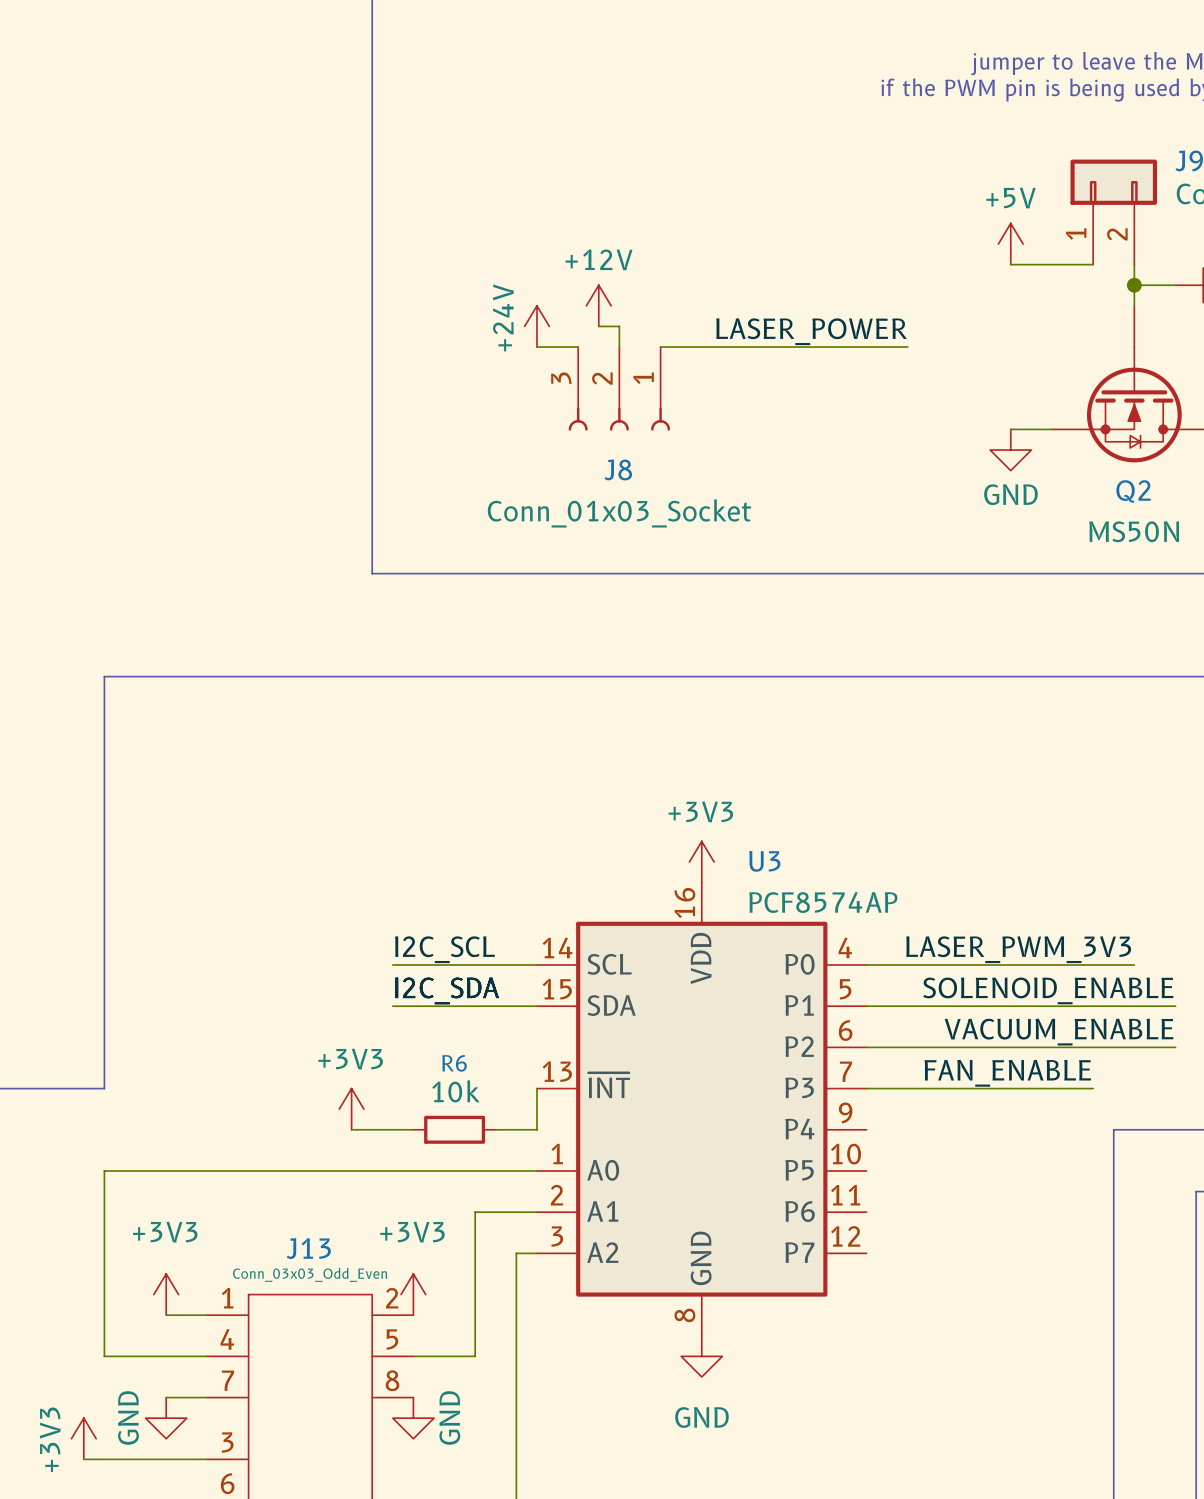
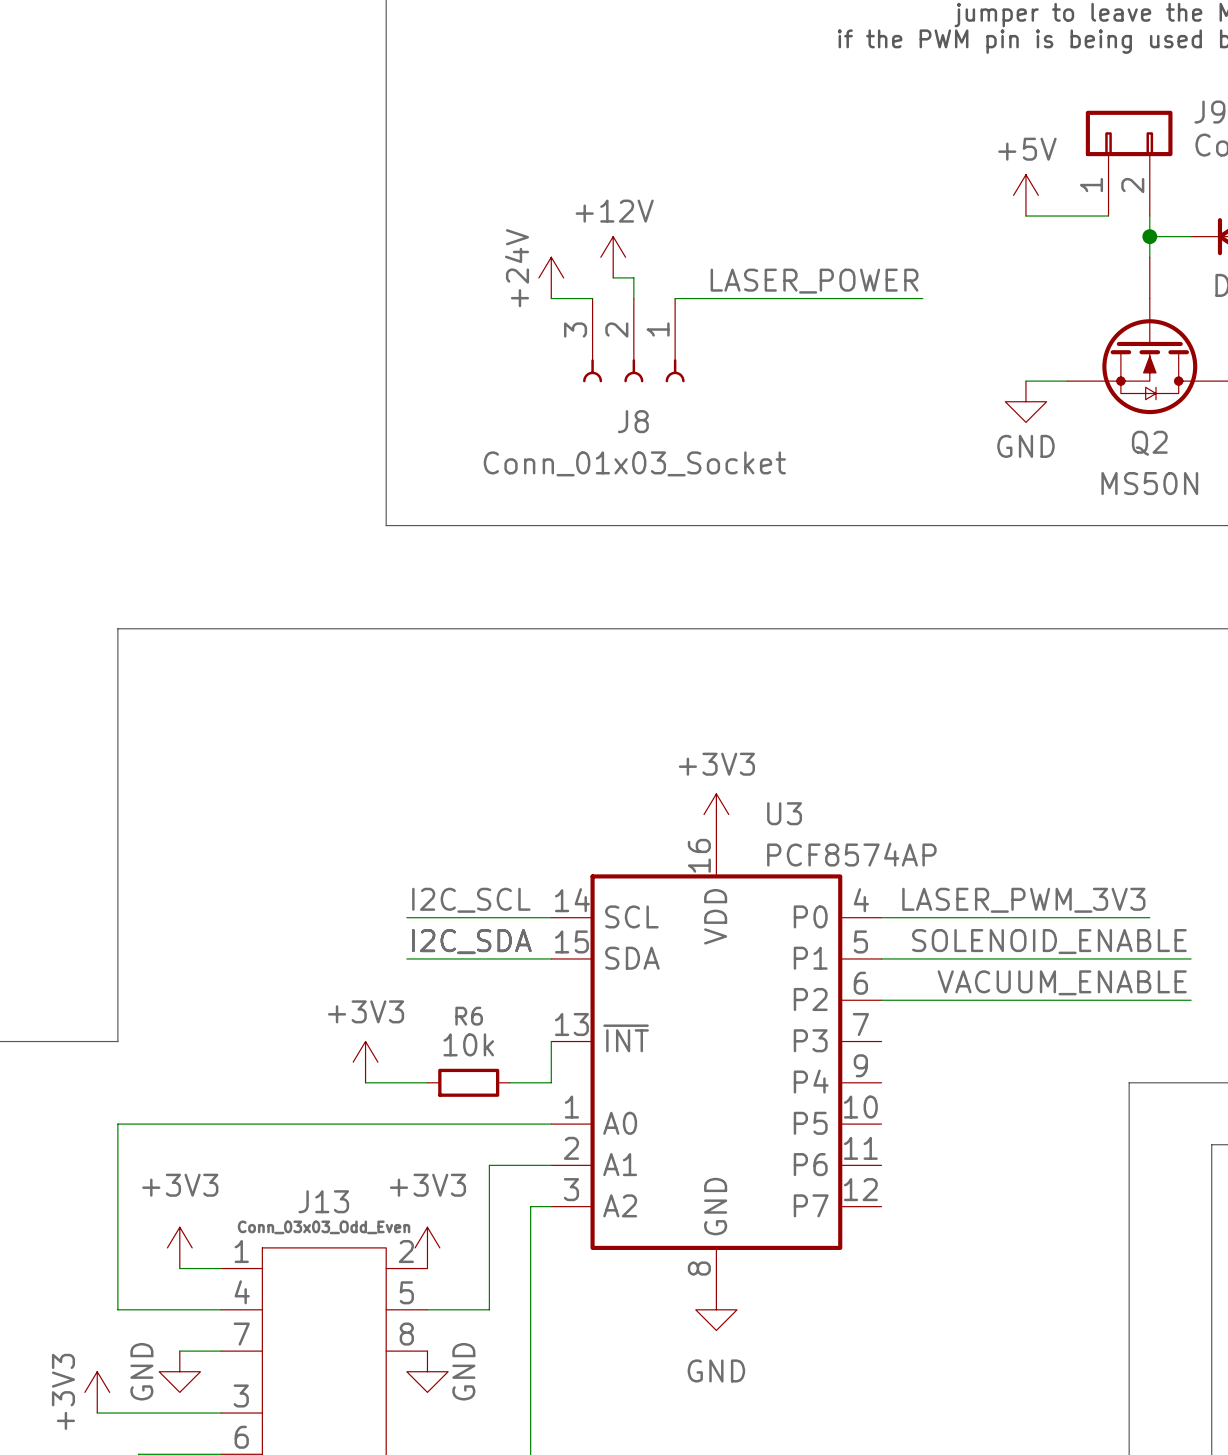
label: FAN_ENABLE (1007, 1073) -> none
wire: (866, 1088) (1093, 1088) -> none

